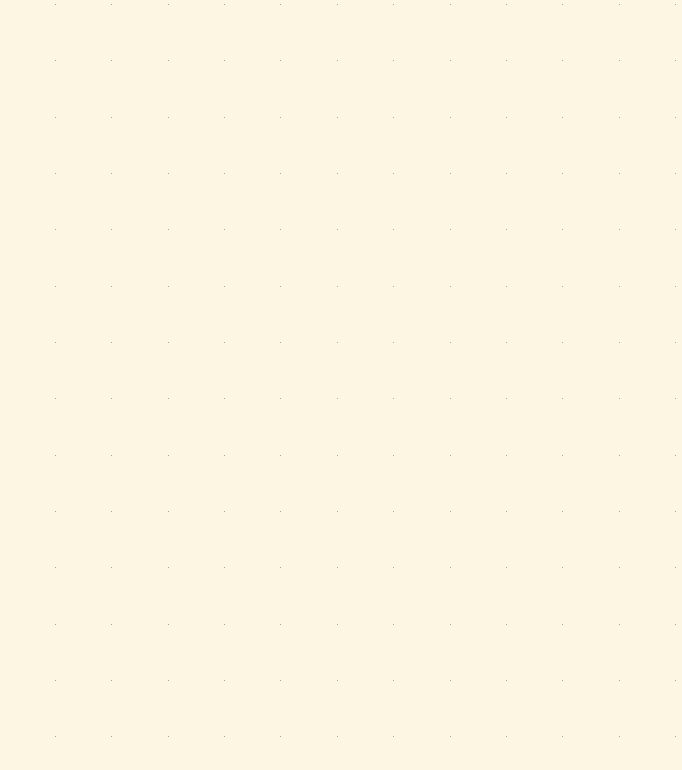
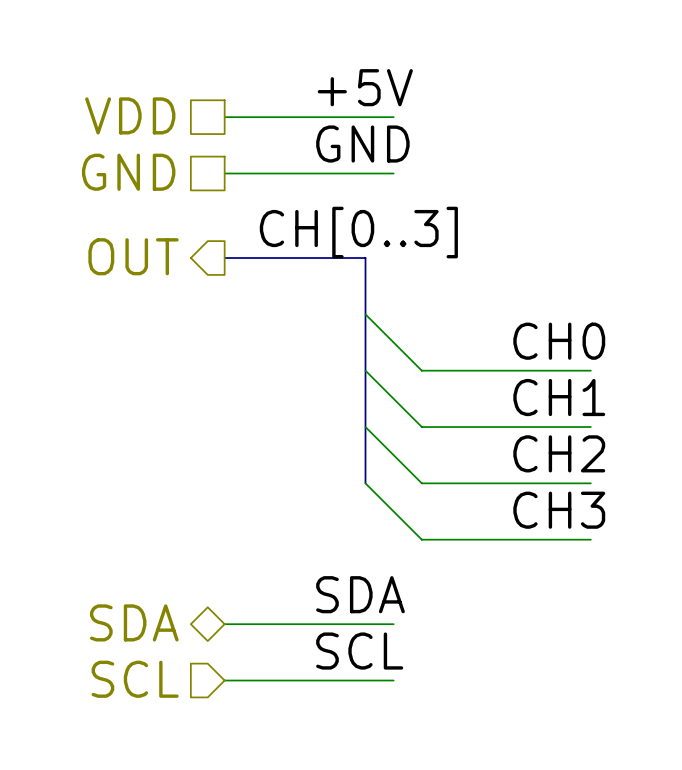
label: none -> +5V (365, 87)
hierarchical label: none -> VDD (130, 115)
wire: none -> (224, 117) (393, 117)
label: none -> GND (362, 144)
hierarchical label: none -> GND (128, 172)
wire: none -> (224, 173) (393, 173)
label: none -> CH[0..3] (358, 232)
hierarchical label: none -> OUT (133, 256)
bus: none -> (224, 258) (365, 258) (365, 483)
wire: none -> (365, 314) (421, 370) (590, 370)
label: none -> CH0 (559, 341)
wire: none -> (365, 370) (421, 427) (590, 427)
label: none -> CH1 (559, 397)
wire: none -> (365, 427) (421, 483) (590, 483)
label: none -> CH2 (559, 453)
wire: none -> (365, 483) (421, 539) (590, 539)
label: none -> CH3 (559, 510)
label: none -> SDA (360, 594)
hierarchical label: none -> SDA (134, 622)
wire: none -> (224, 624) (393, 624)
label: none -> SCL (359, 651)
hierarchical label: none -> SCL (135, 679)
wire: none -> (224, 680) (393, 680)

